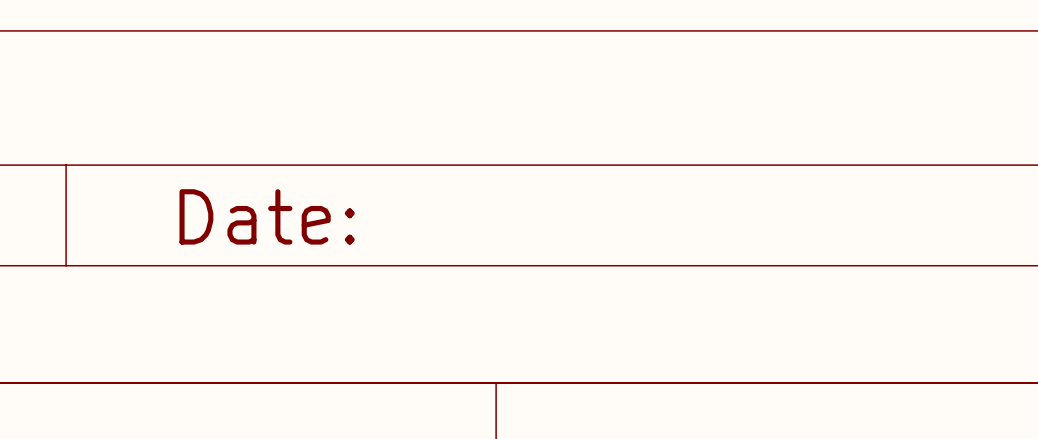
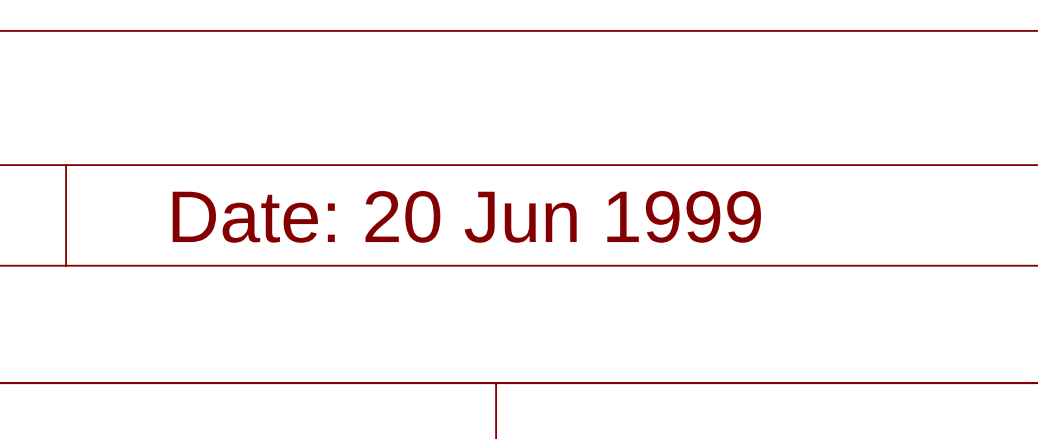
title block: Date: (267, 216) -> Date: 20 Jun 1999 (466, 216)

